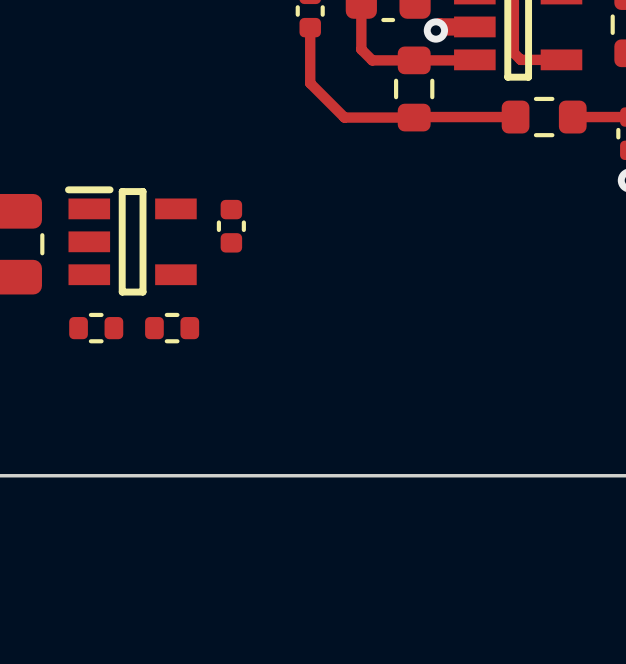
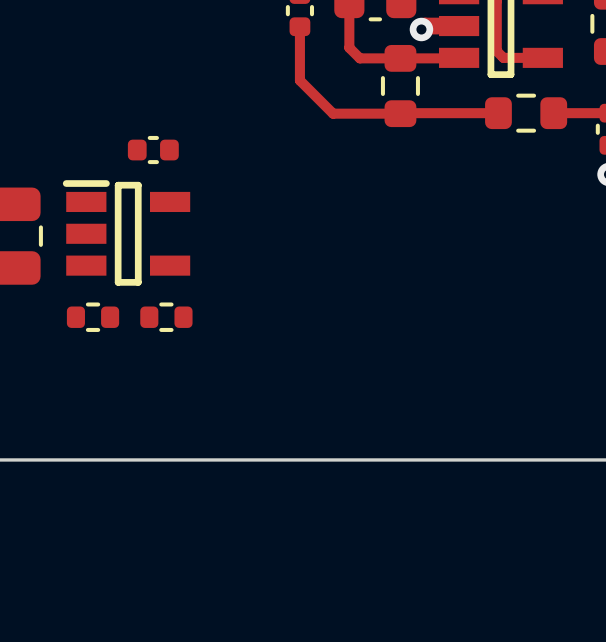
part rotation: 0° (231, 226) -> 90° clockwise (153, 150)
part position: (231, 226) -> (153, 150)

